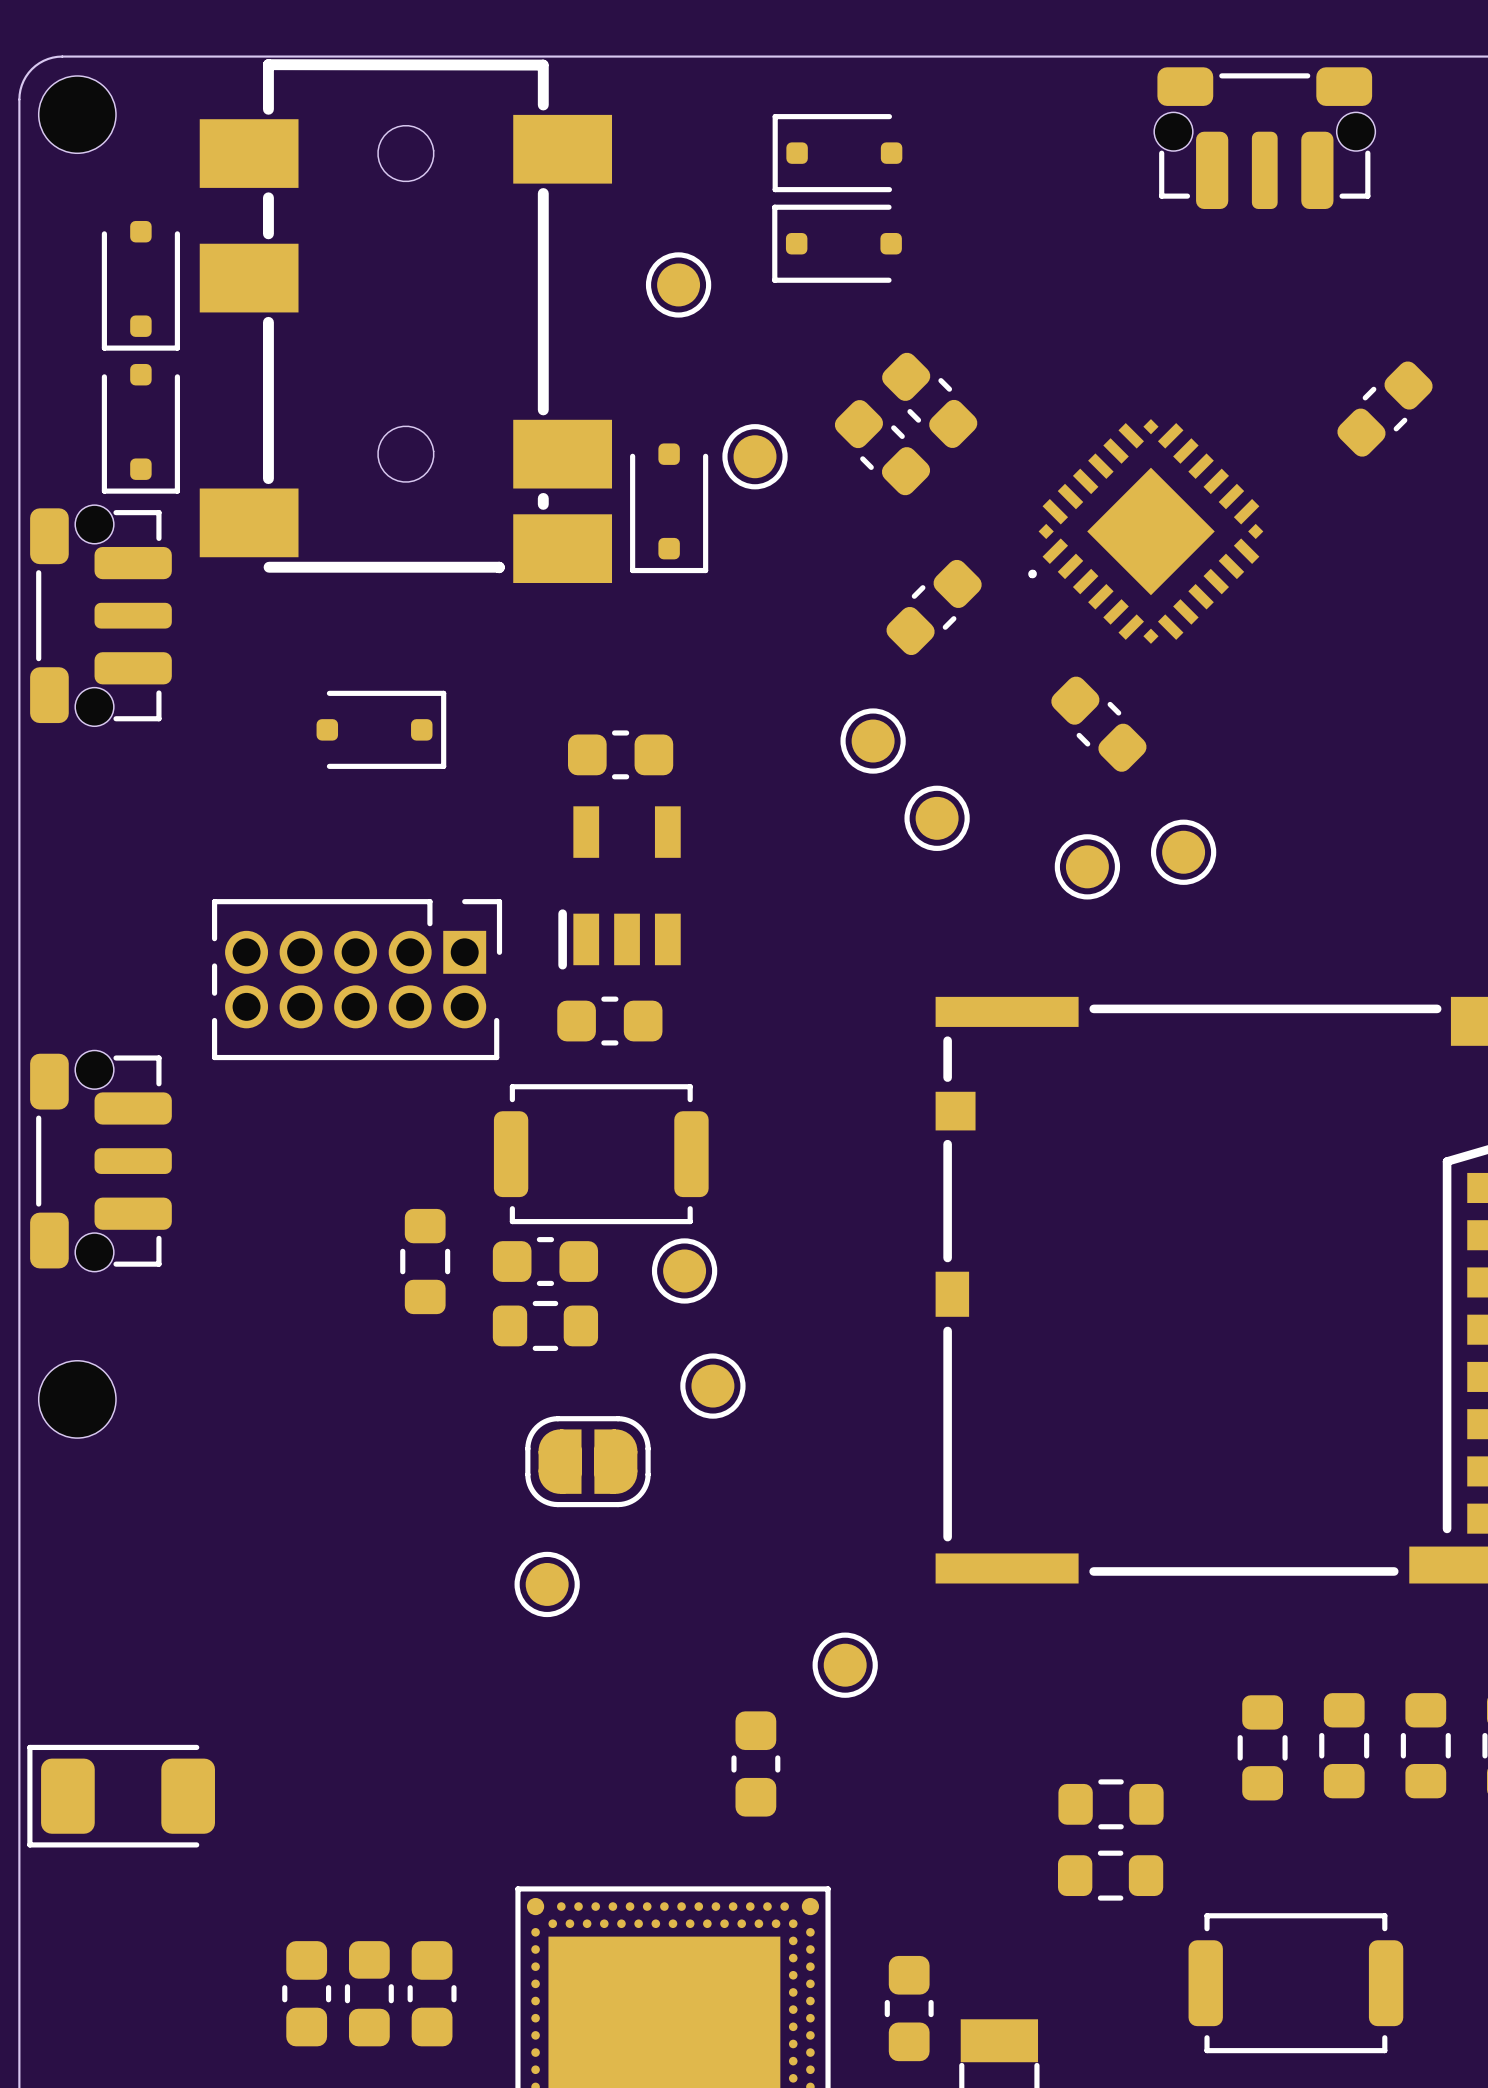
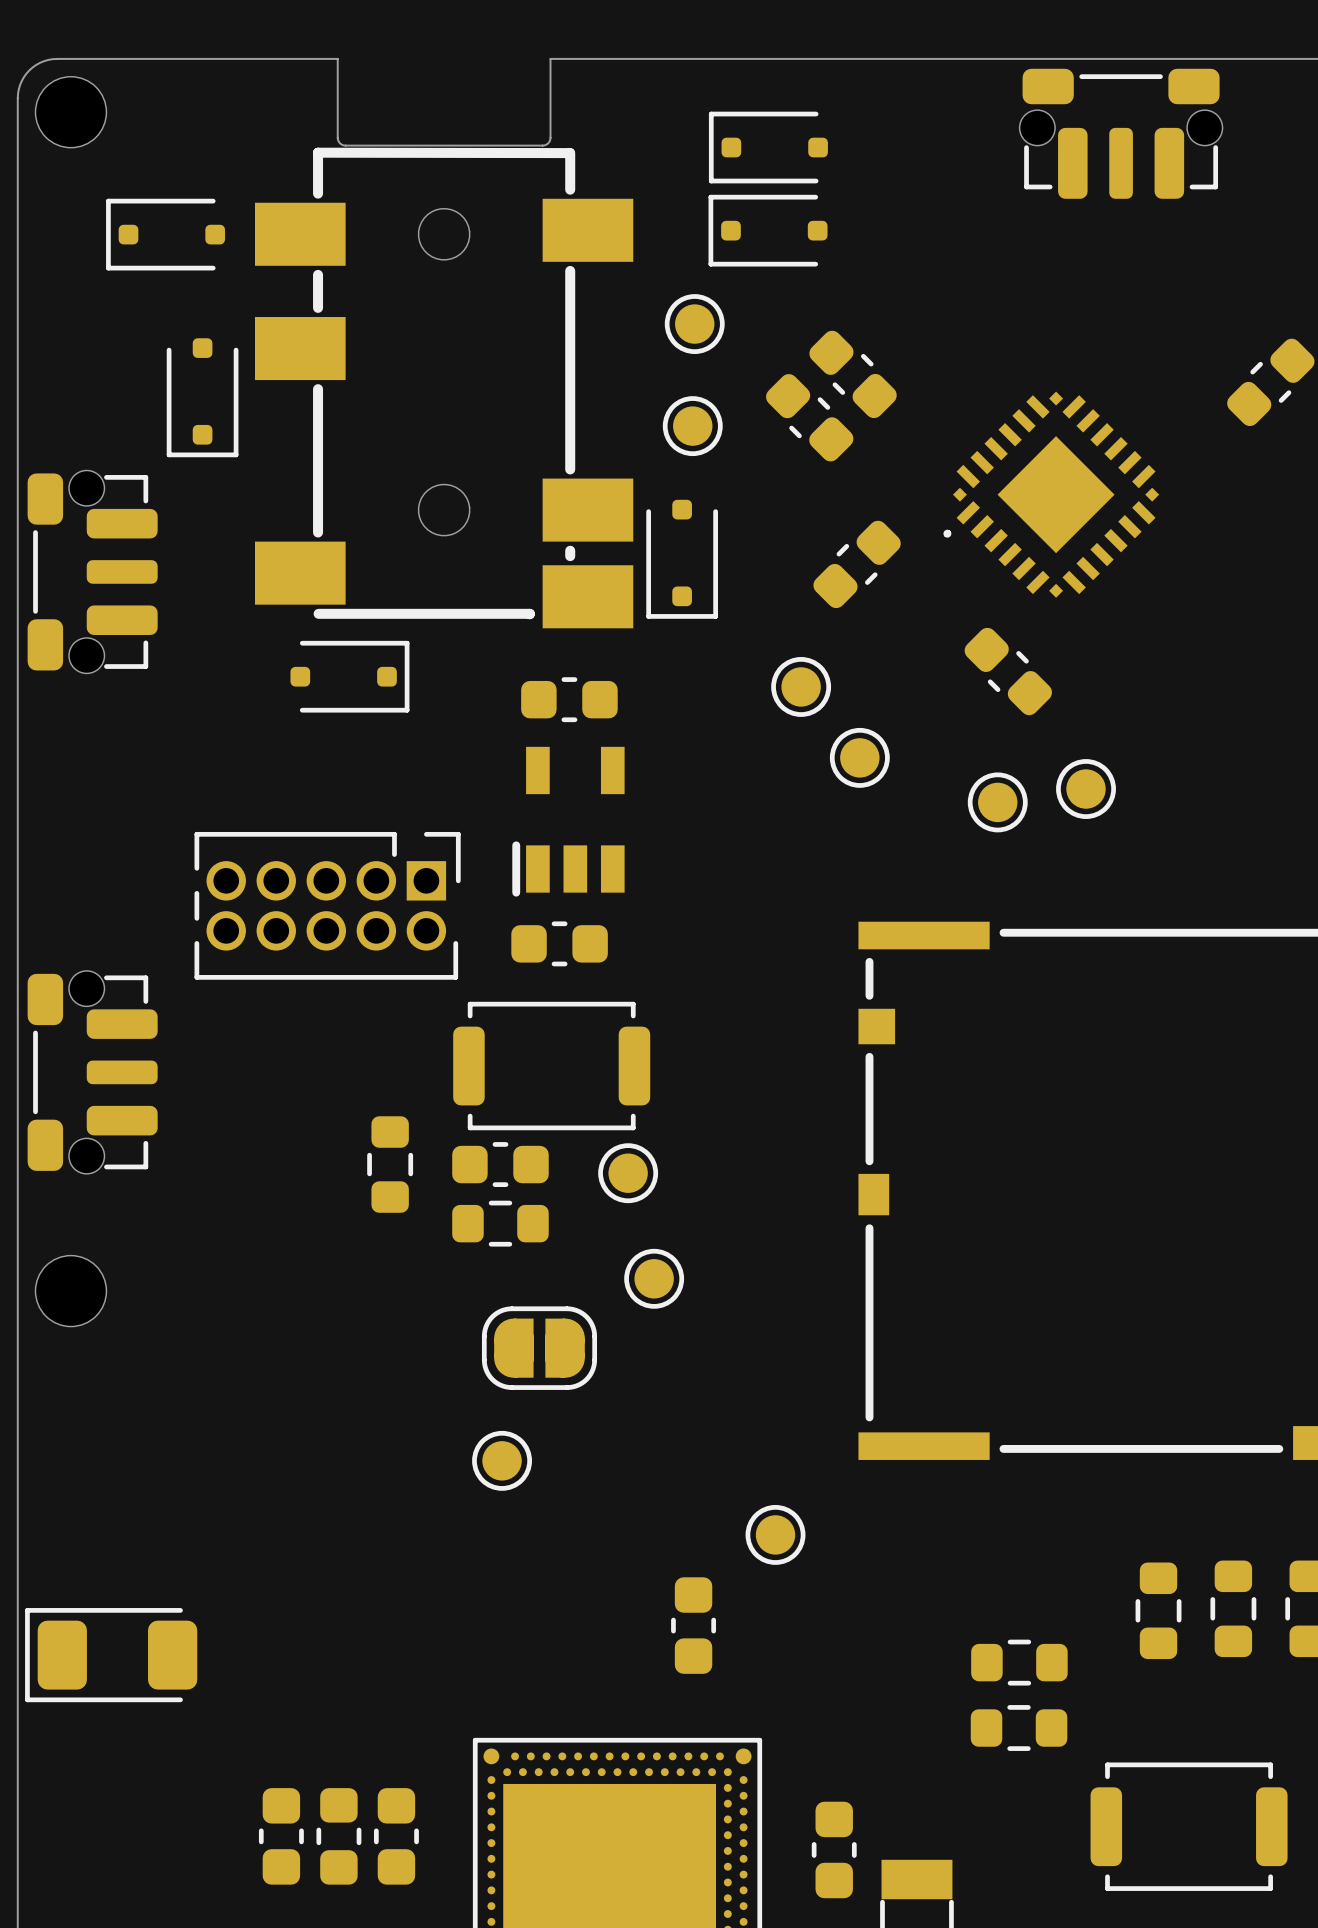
board edge: (599, 56) (368, 56) -> none
part position: (1264, 138) -> (1121, 133)
part position: (678, 284) -> (694, 324)
part rotation: 0° (140, 285) -> 90° clockwise (165, 234)
part: (405, 321) -> none
part: none -> (444, 343)
part position: (140, 428) -> (202, 397)
part position: (669, 508) -> (682, 559)

